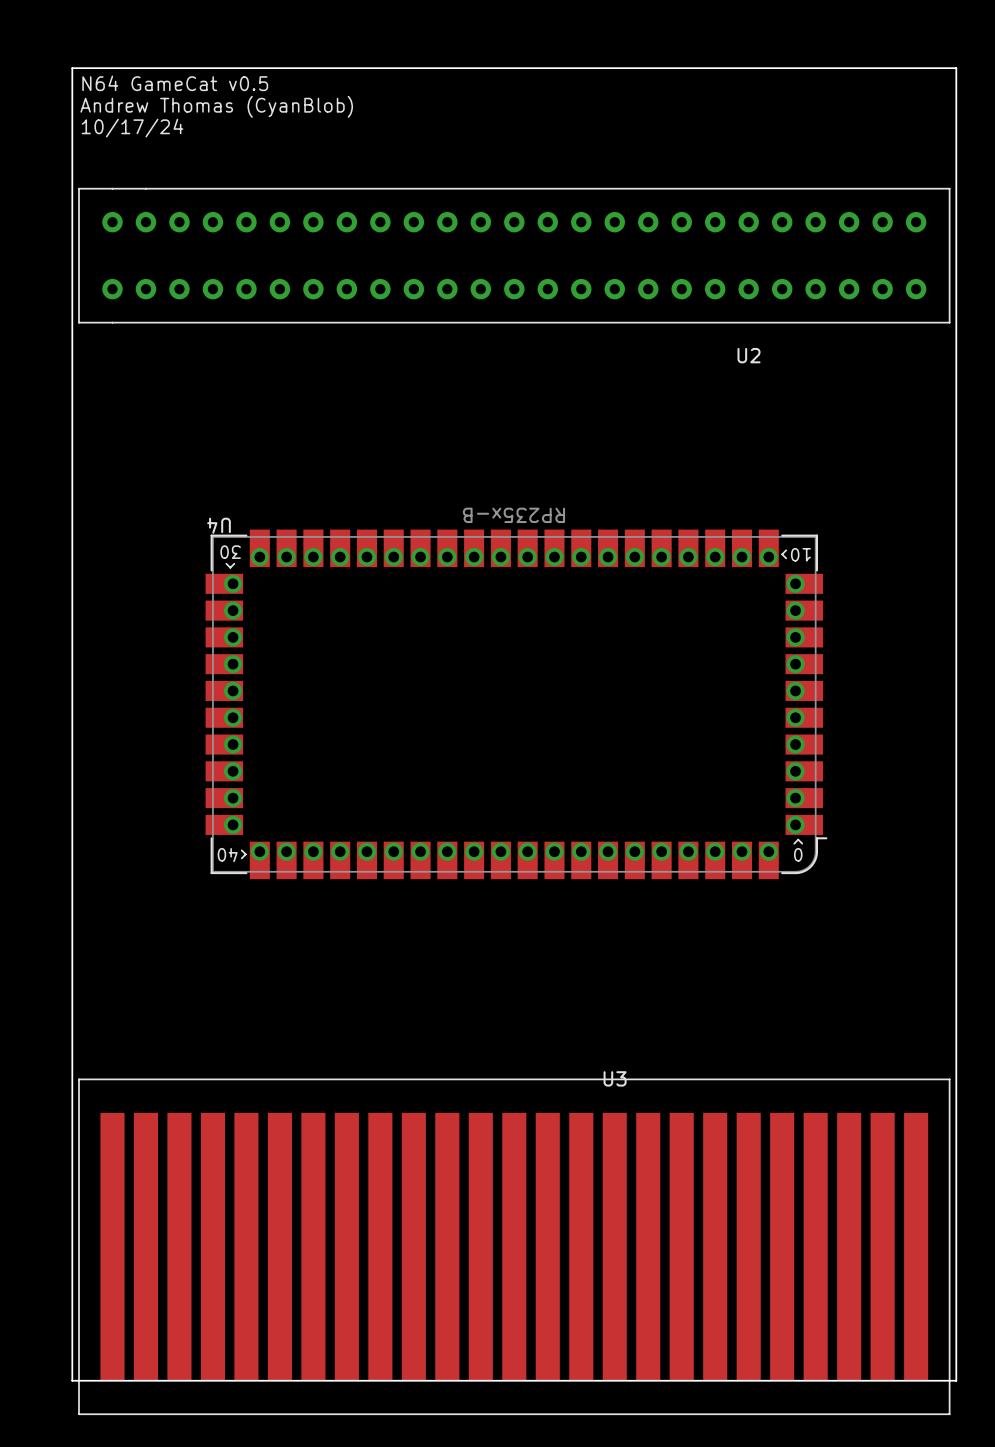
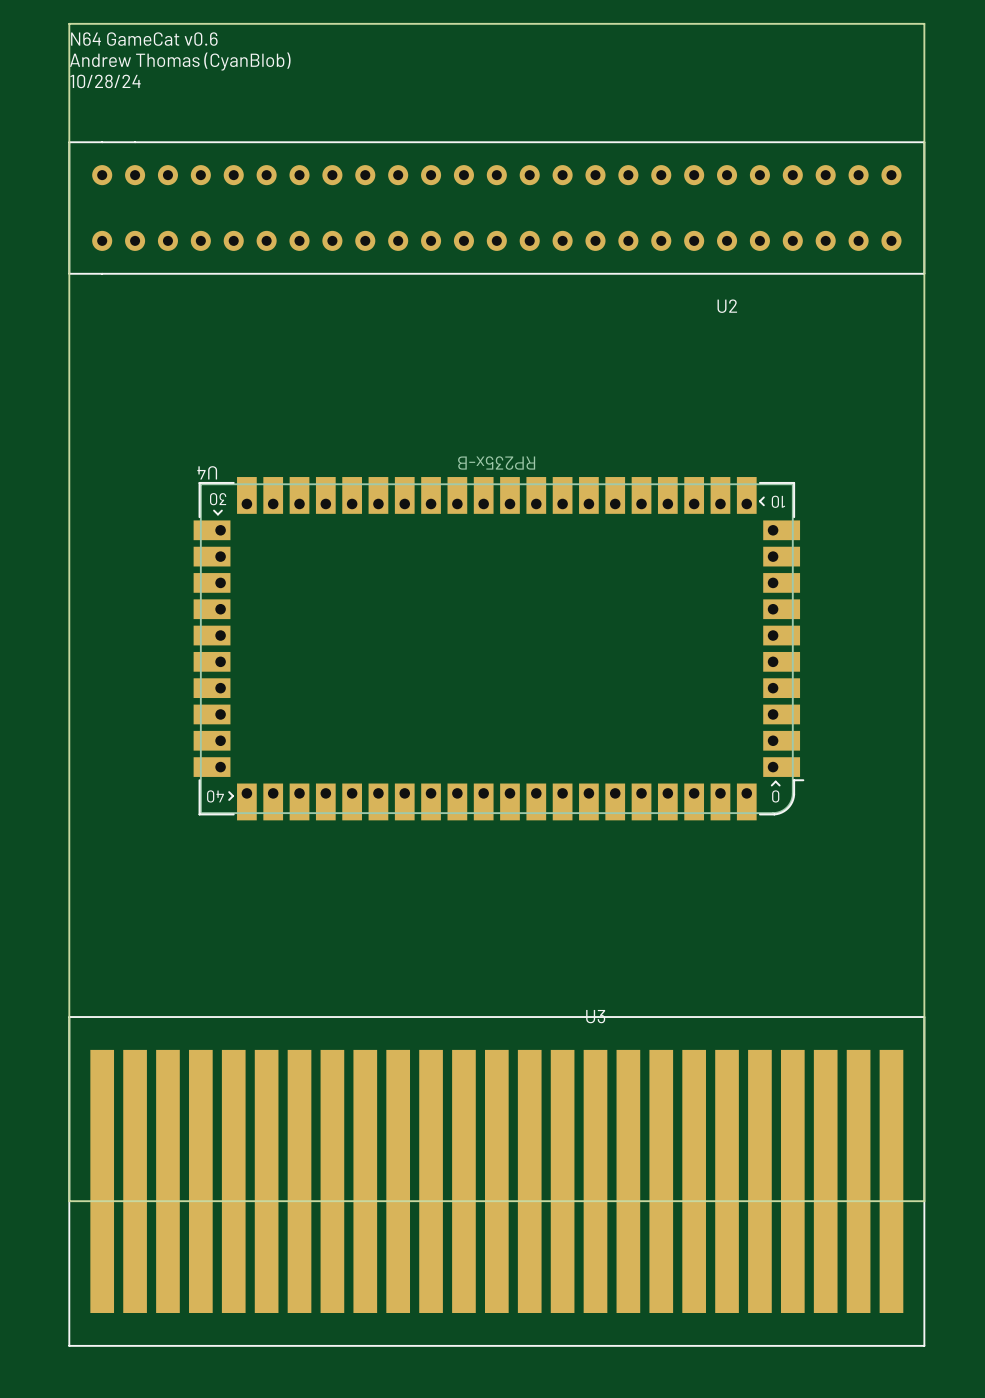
board edge: (79, 68) (72, 68) (72, 1380) (956, 1380) (956, 68) (949, 68) -> (69, 23) (69, 1201) (924, 1201) (924, 23)
text: N64 GameCat v0.5 (175, 83) -> N64 GameCat v0.6 (144, 39)
text: 10/17/24 (132, 128) -> 10/28/24 (105, 81)

